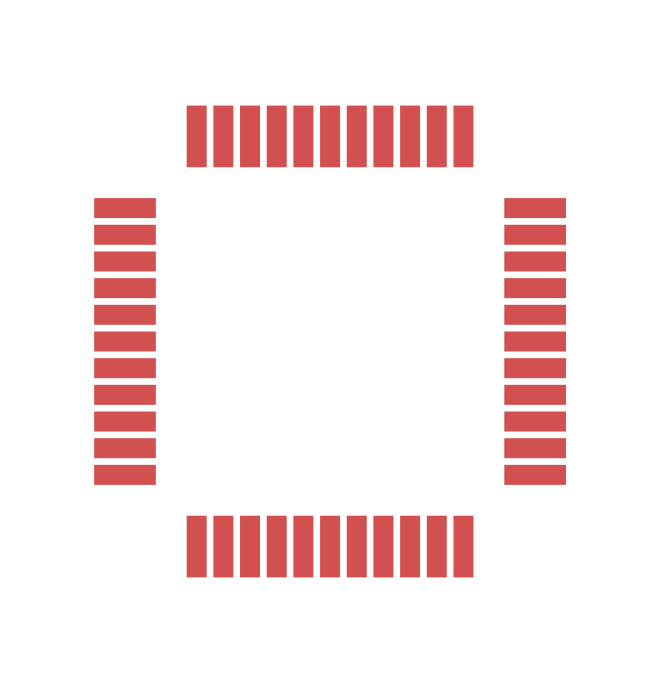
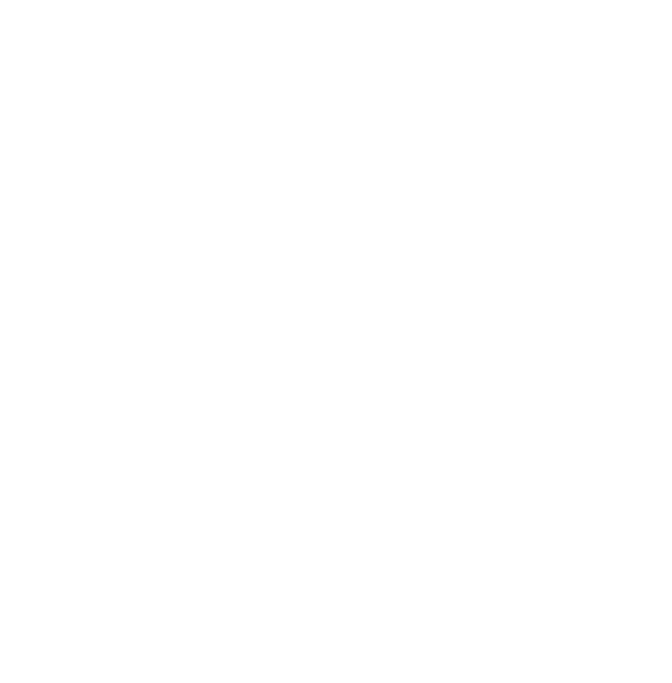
part: (330, 341) -> none

